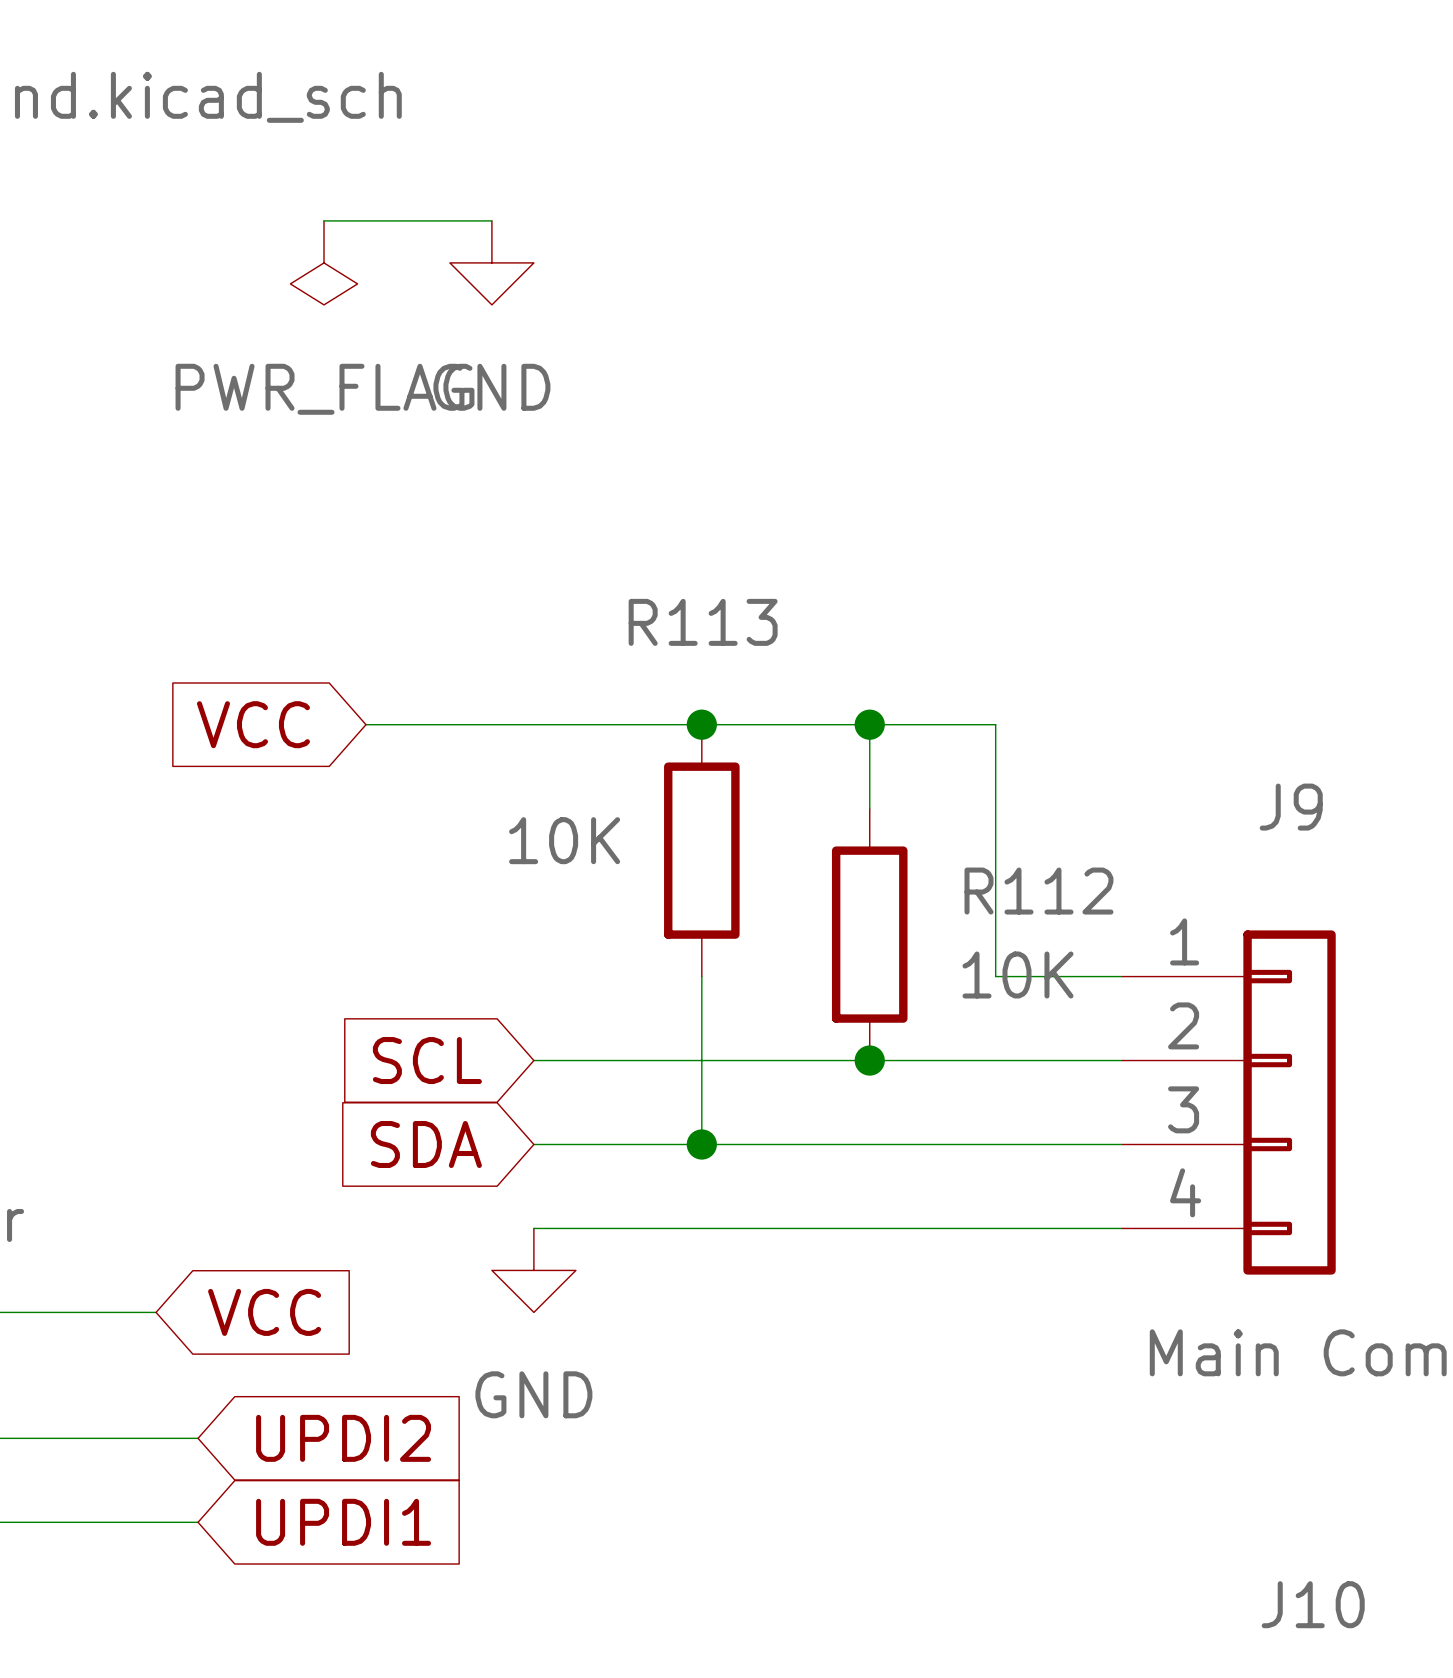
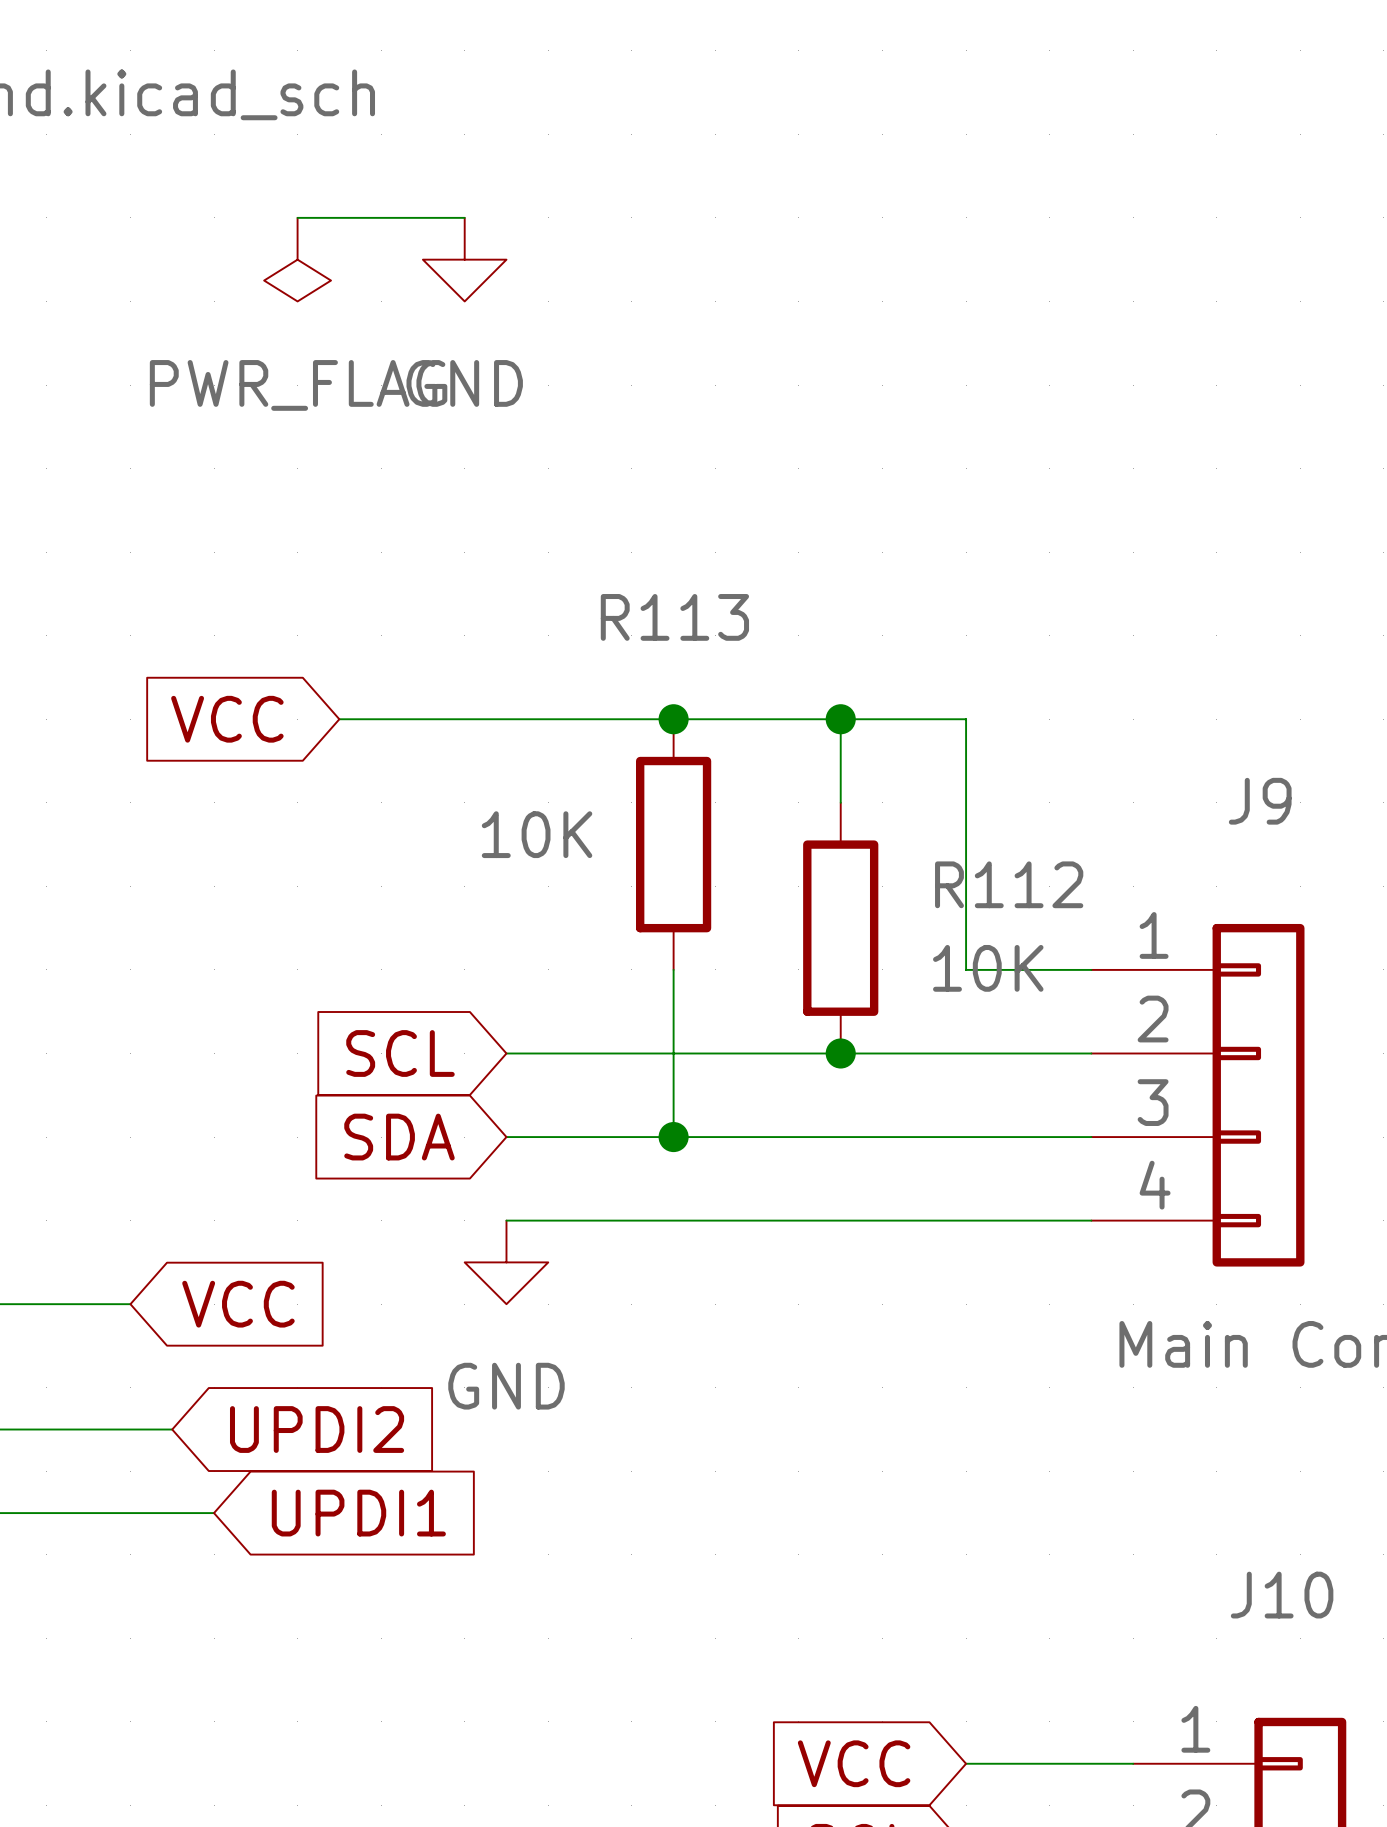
wire: none -> (172, 1513) (214, 1513)
global label position: UPDI1 (343, 1522) -> UPDI1 (358, 1513)

